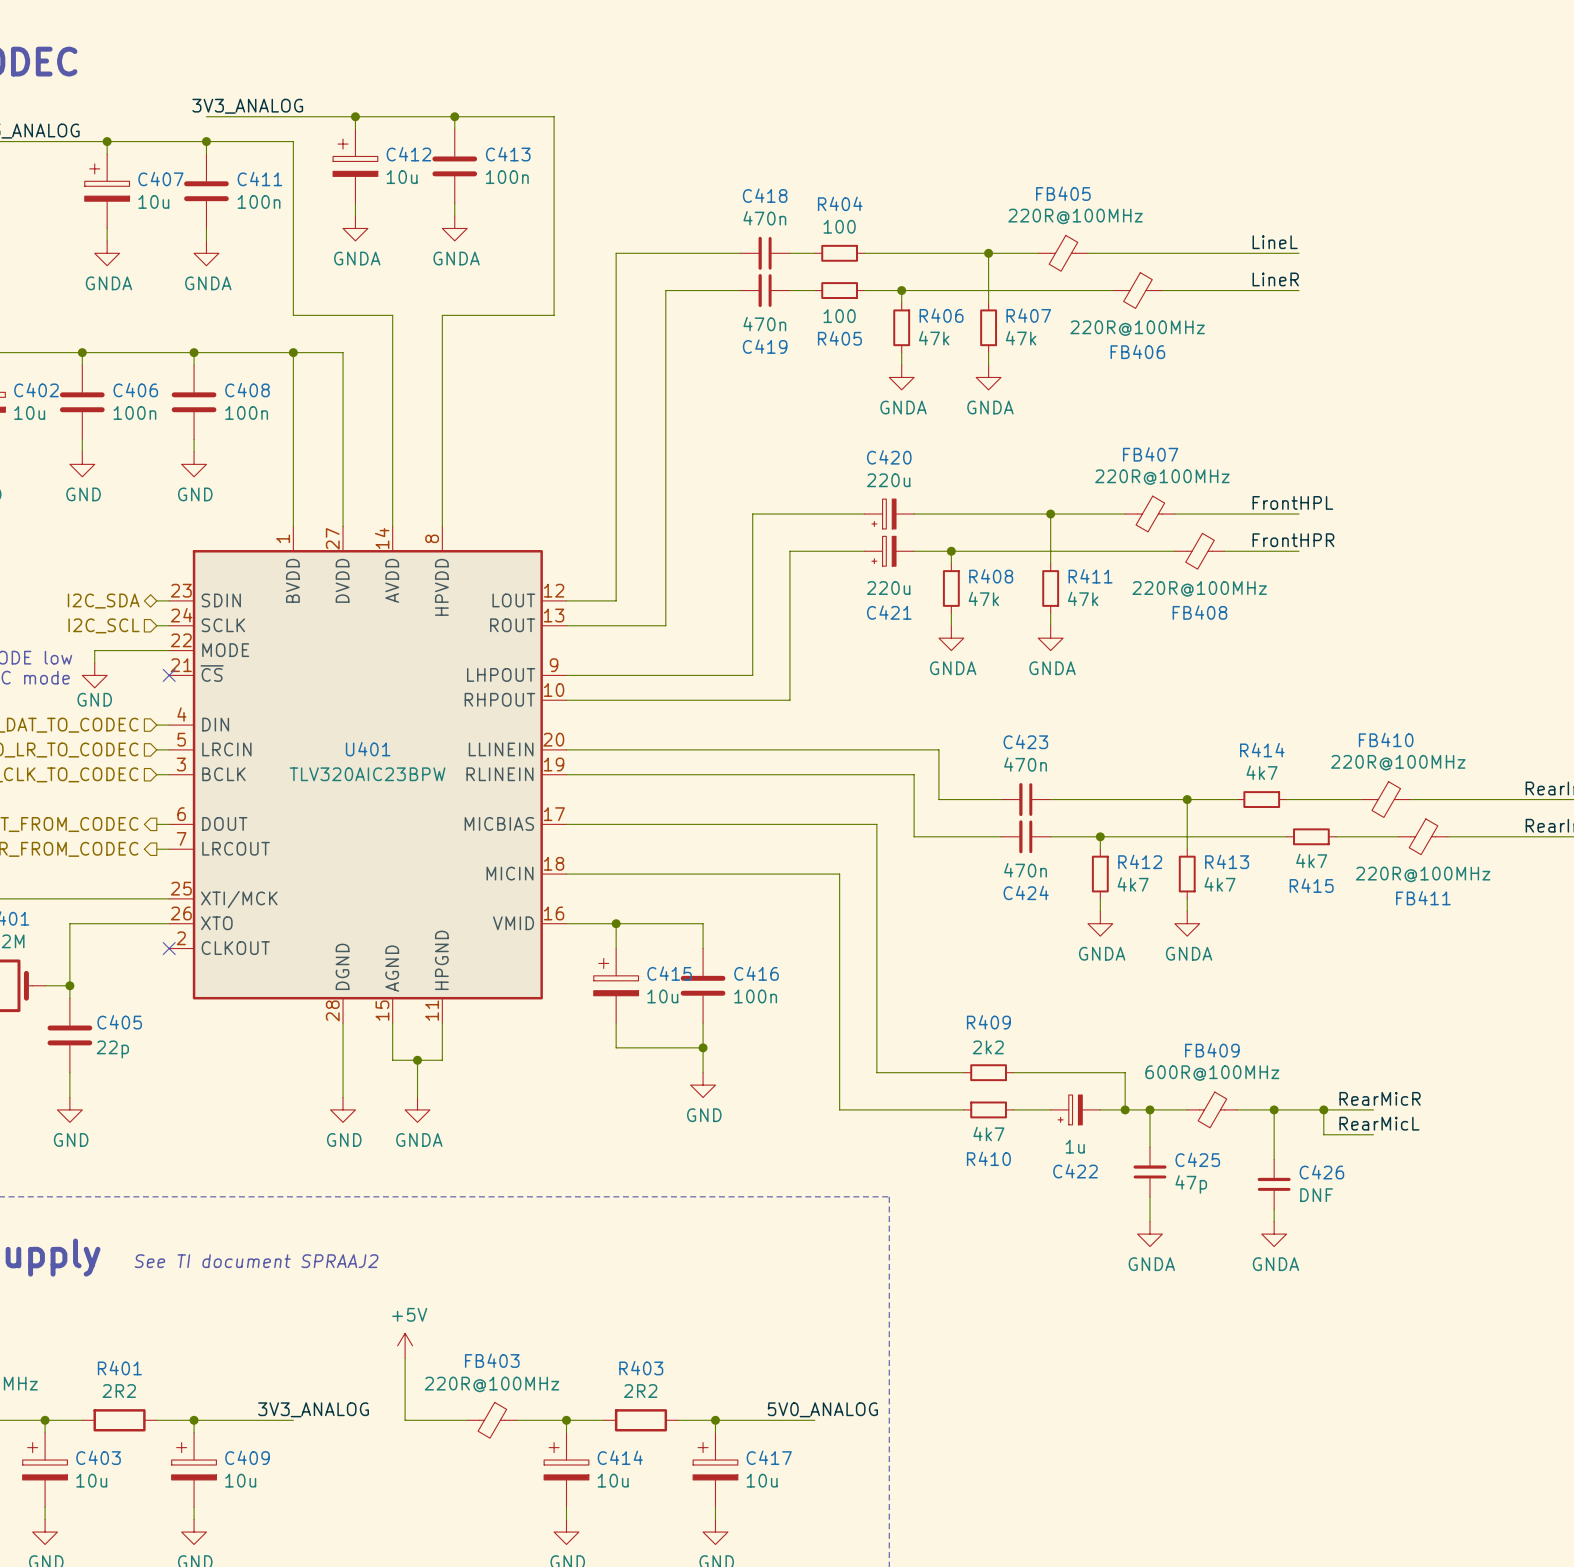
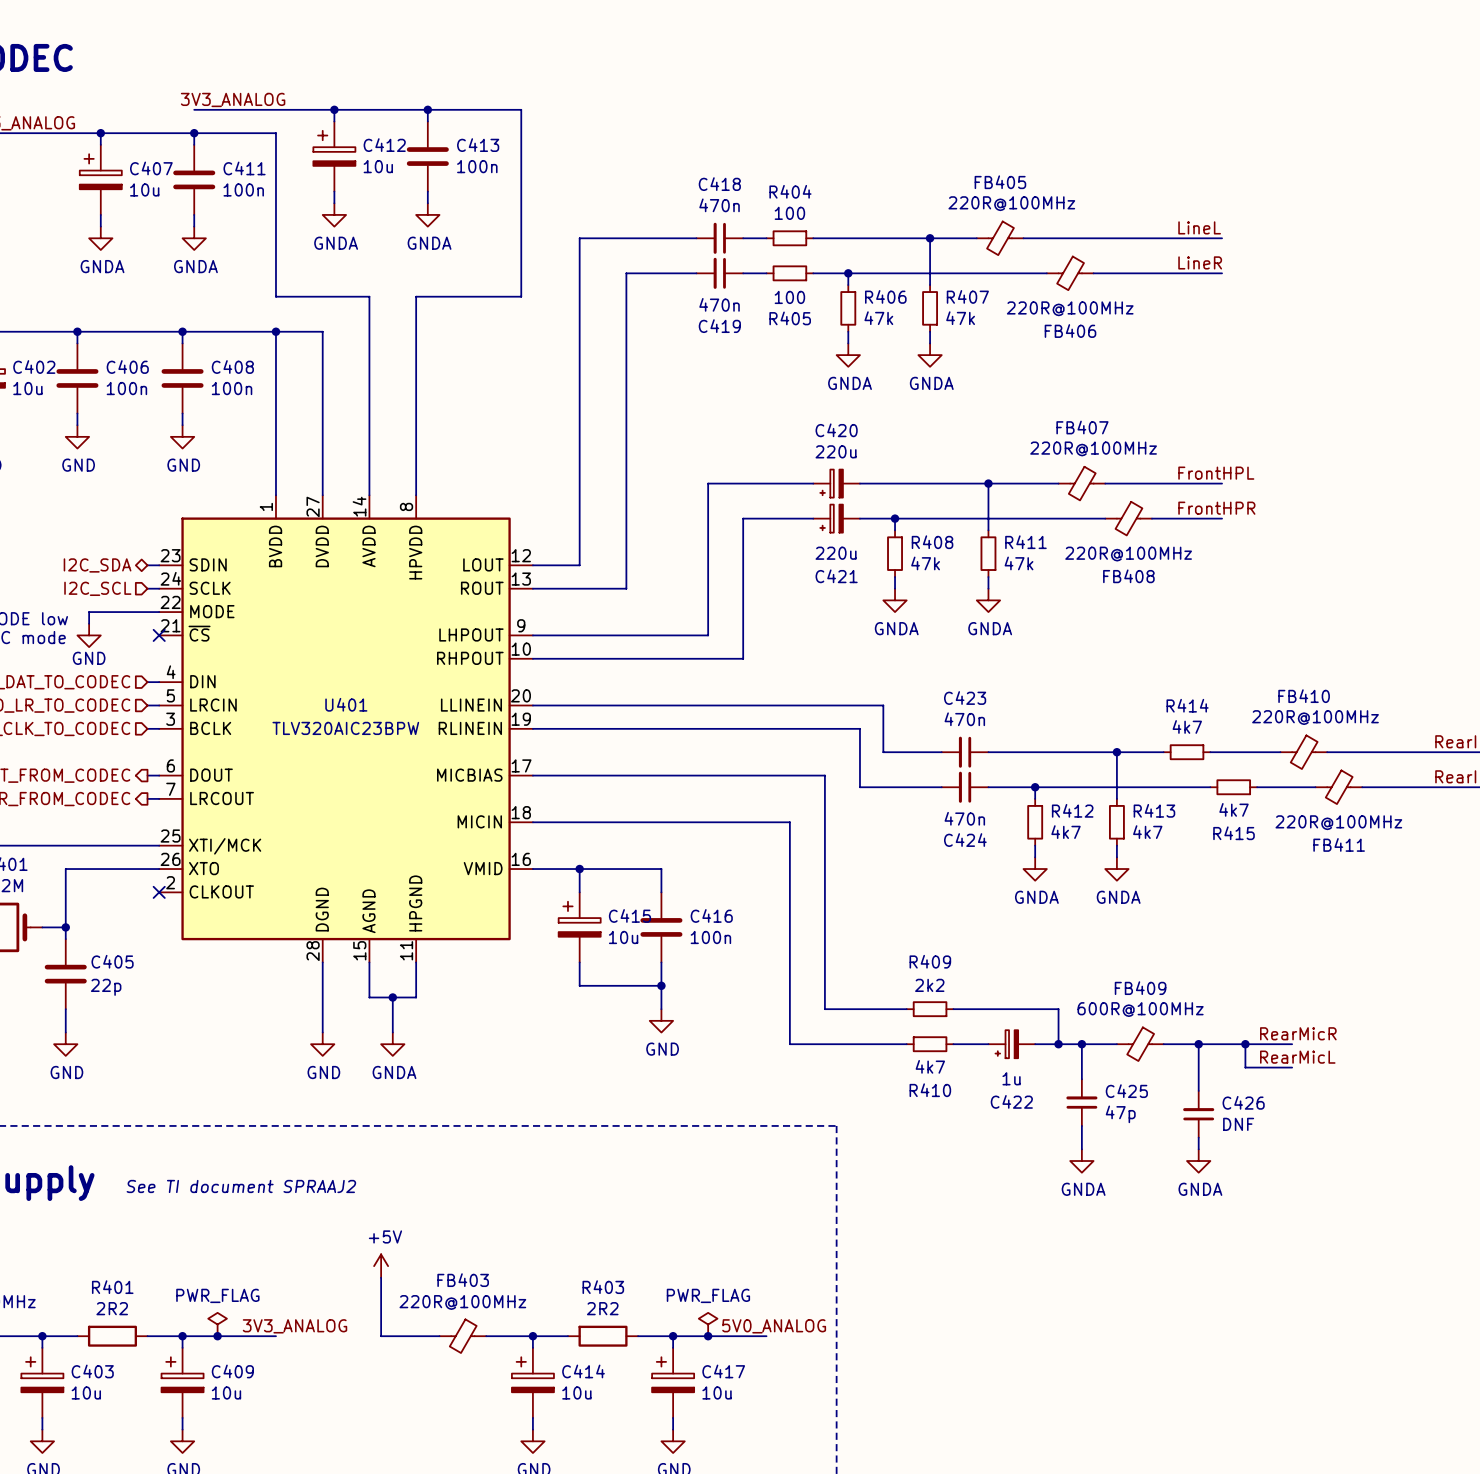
power symbol: none -> PWR_FLAG (217, 1324)
power symbol: none -> PWR_FLAG (708, 1324)
junction: none -> (217, 1336)
junction: none -> (708, 1336)

